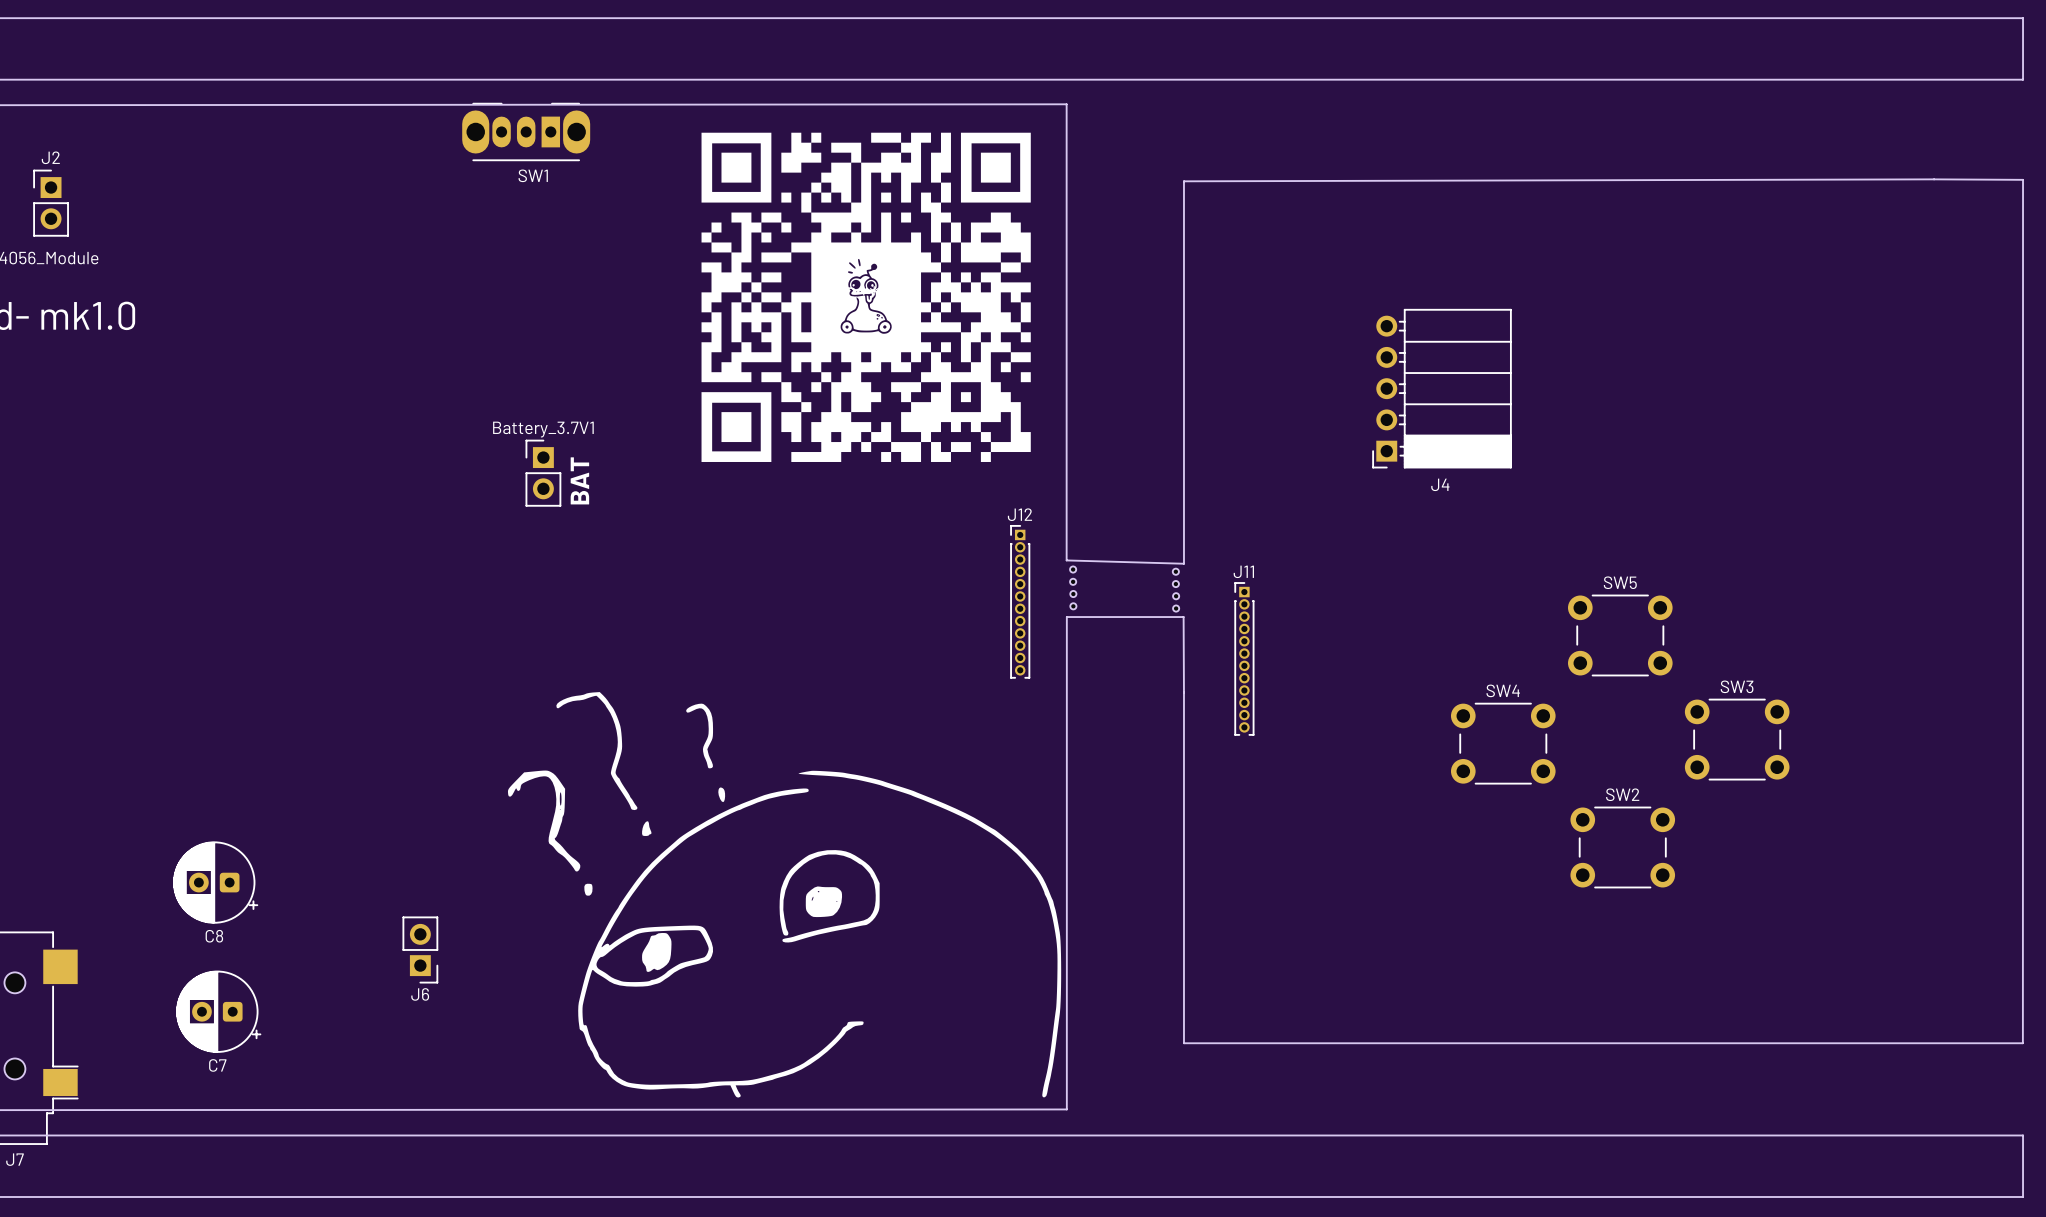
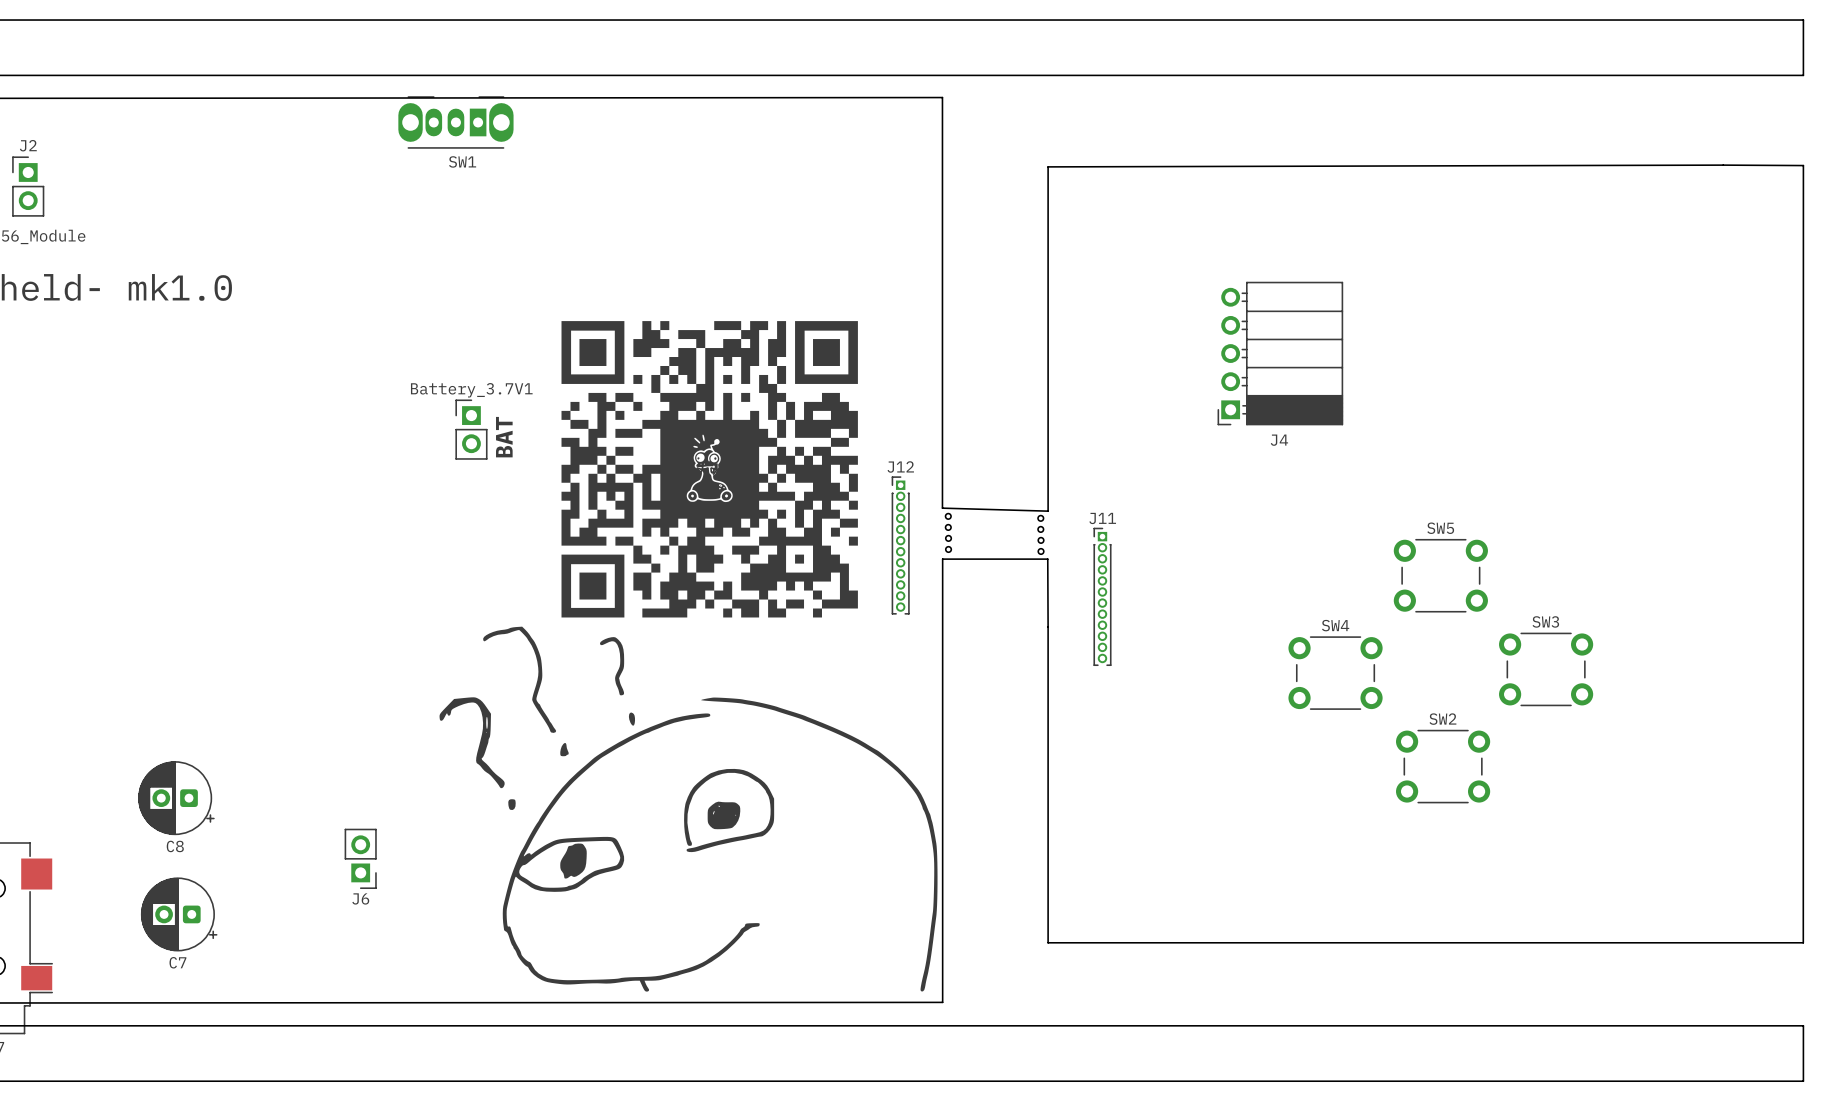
part position: (866, 297) -> (709, 469)

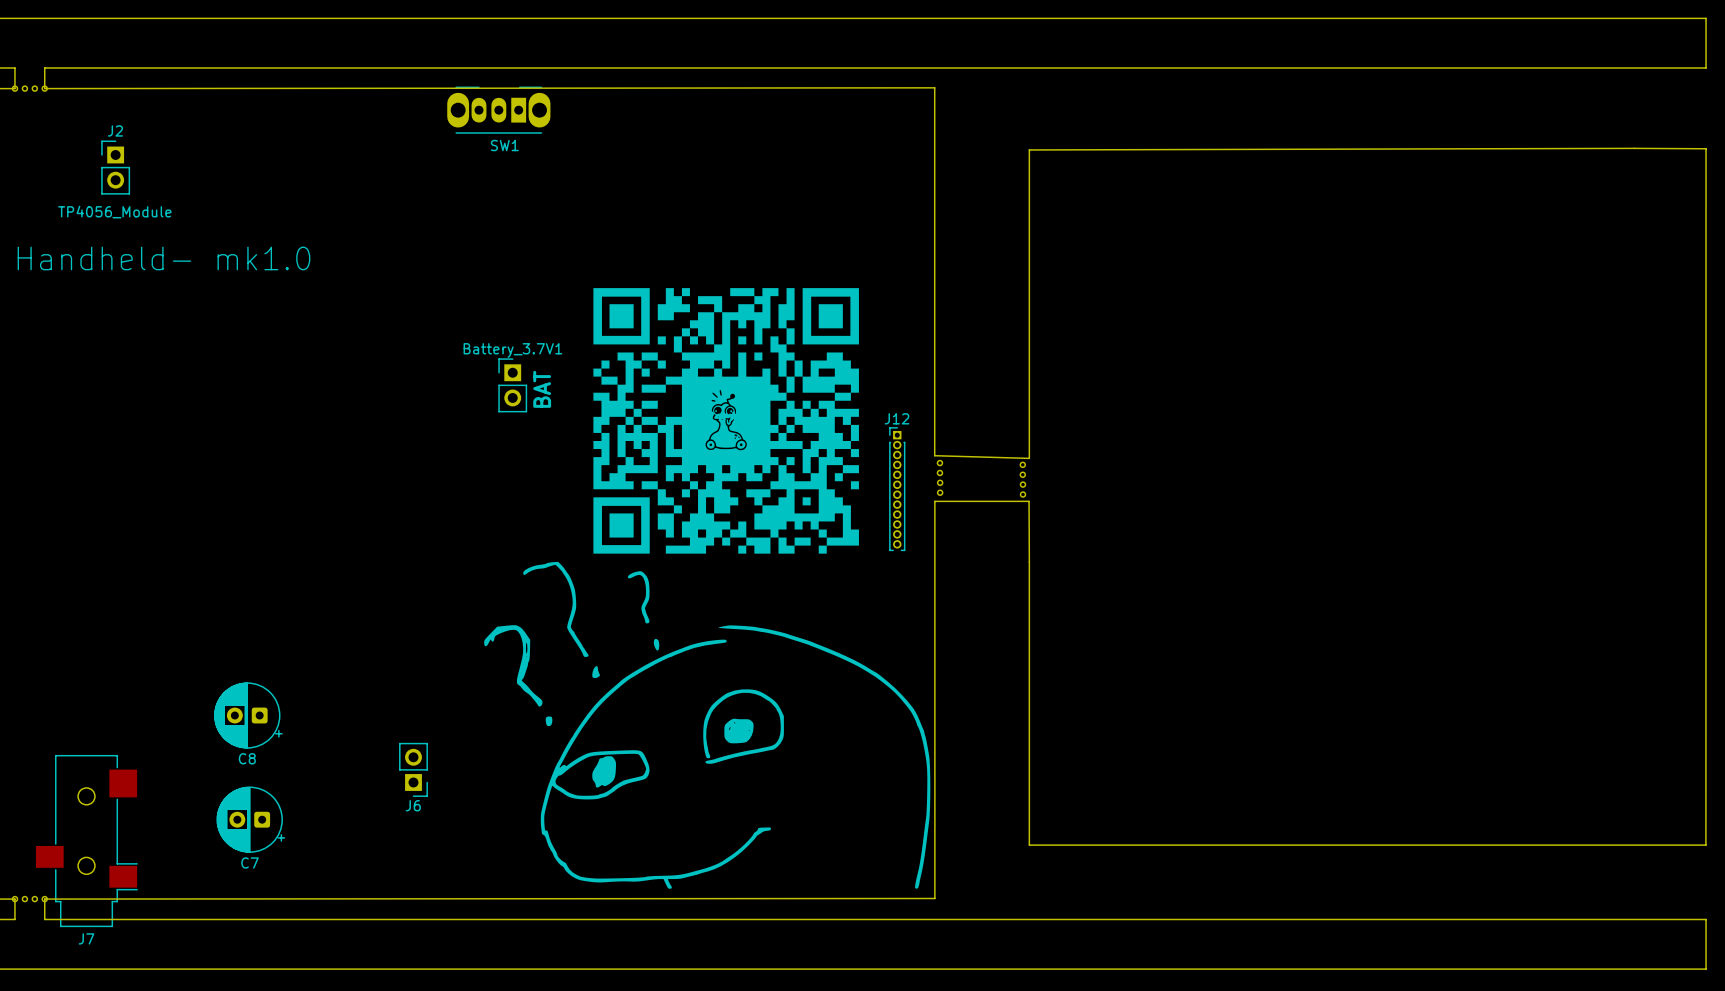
J4: (1280, 353) -> none
SW5: (1440, 575) -> none
J11: (1102, 596) -> none
SW3: (1546, 669) -> none
SW4: (1335, 673) -> none
SW2: (1443, 766) -> none

